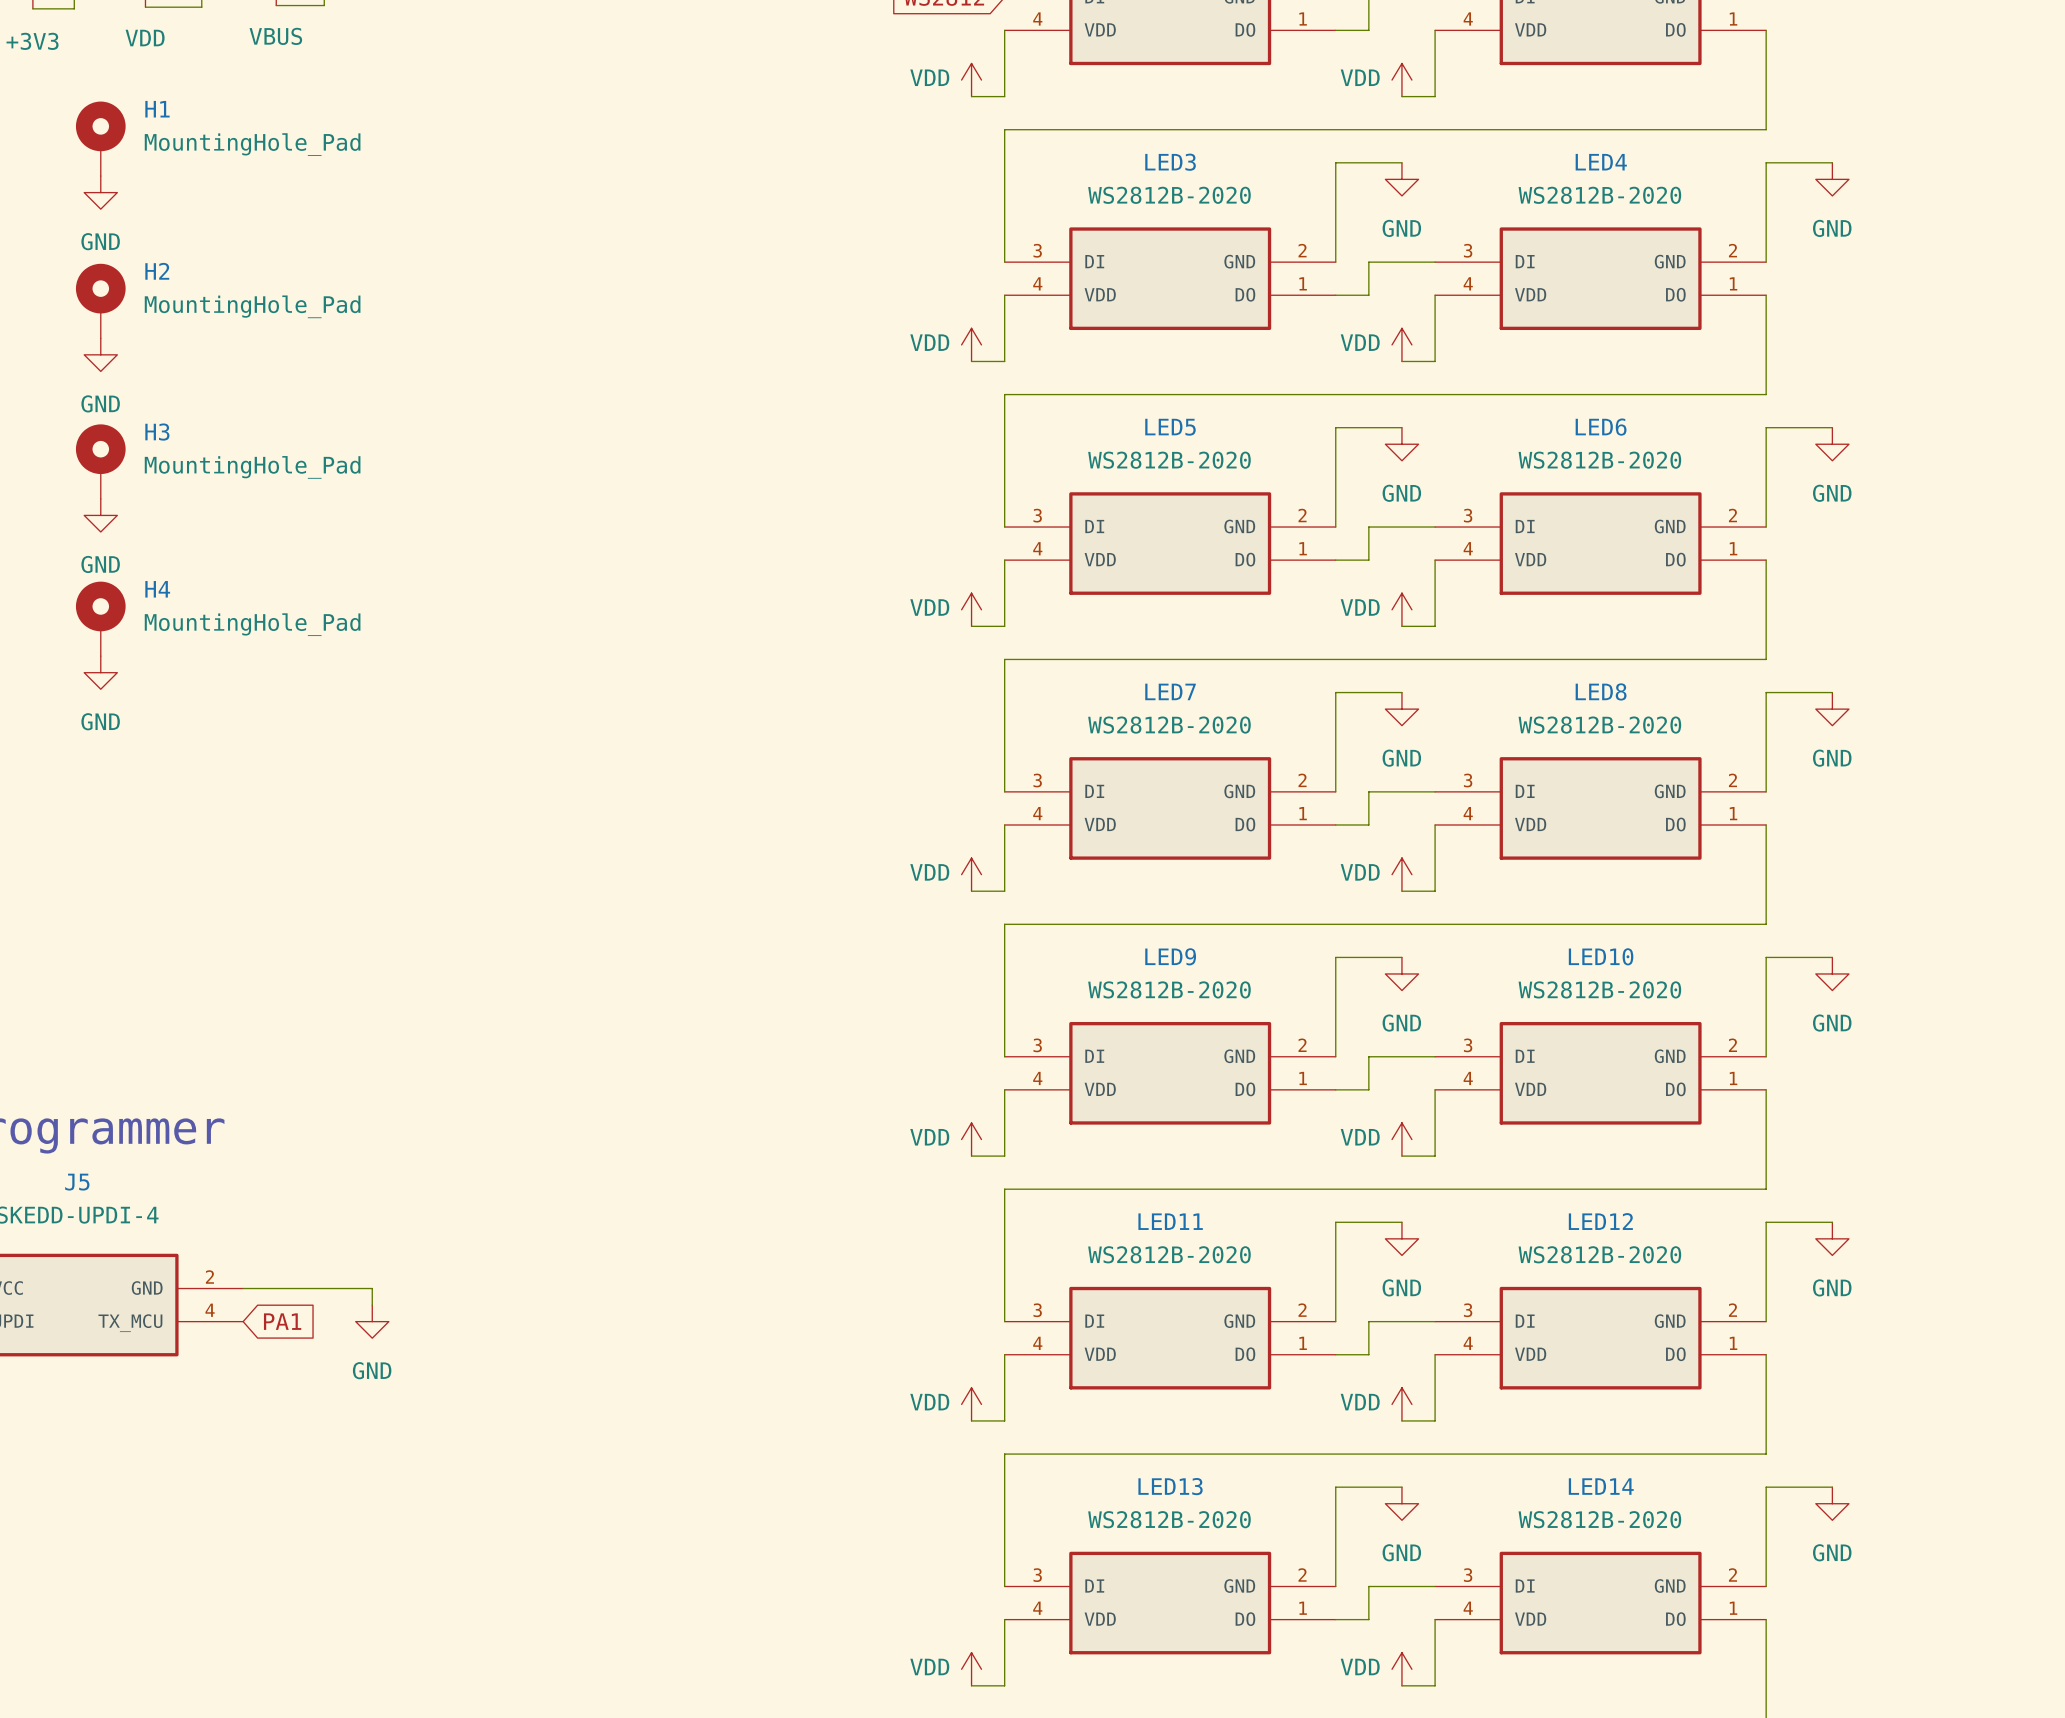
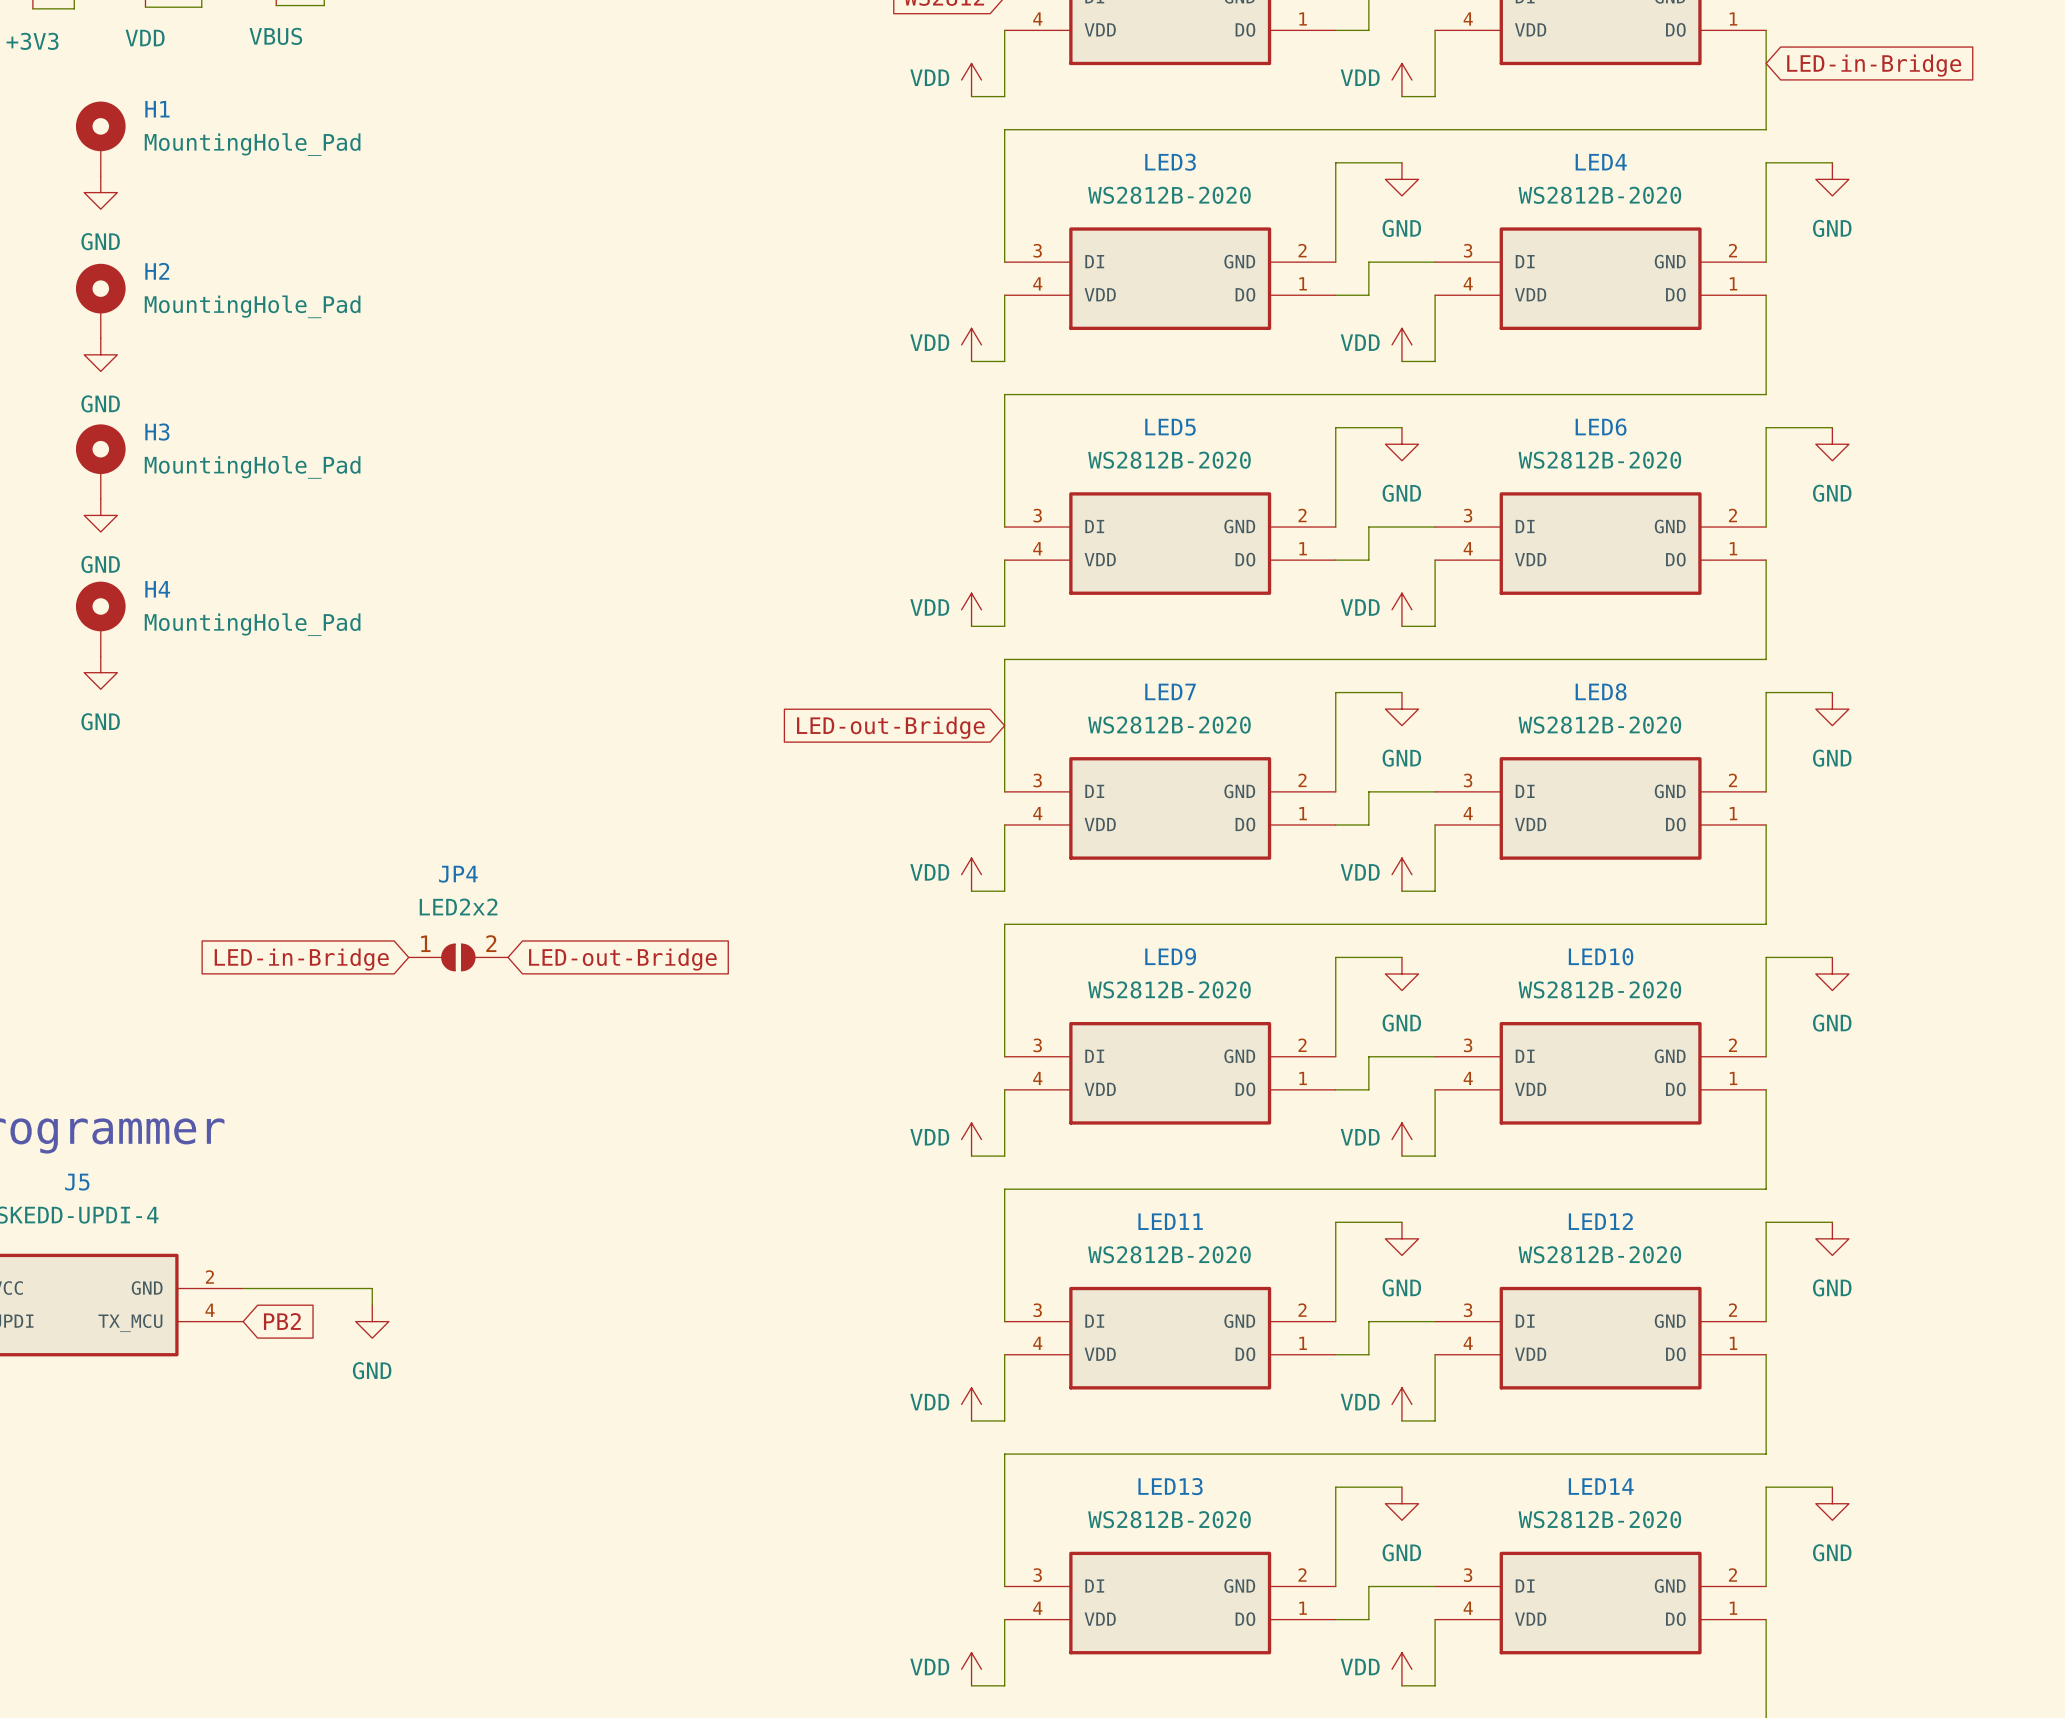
global label: none -> LED-in-Bridge (1874, 65)
global label: none -> LED-out-Bridge (890, 727)
JP4: none -> LED2x2 (458, 957)
global label: none -> LED-in-Bridge (301, 959)
global label: none -> LED-out-Bridge (622, 959)
global label: PA1 (282, 1321) -> PB2 (282, 1321)

